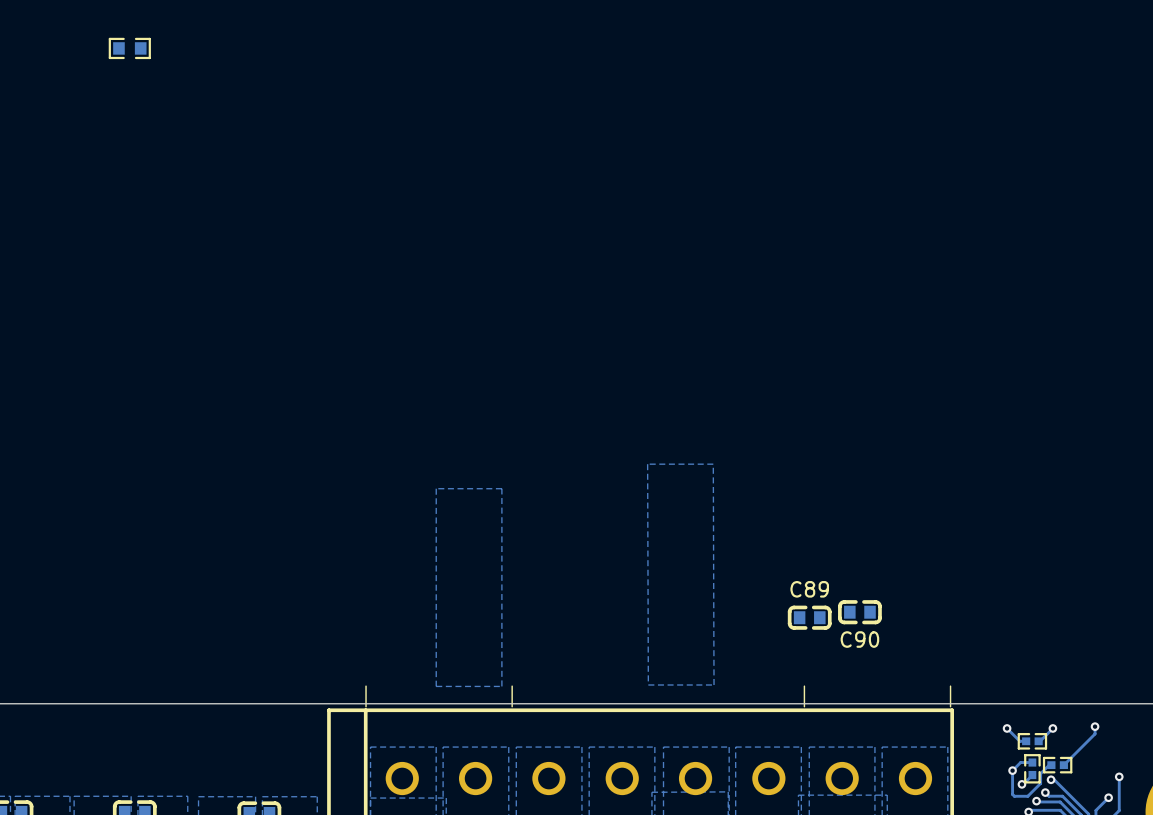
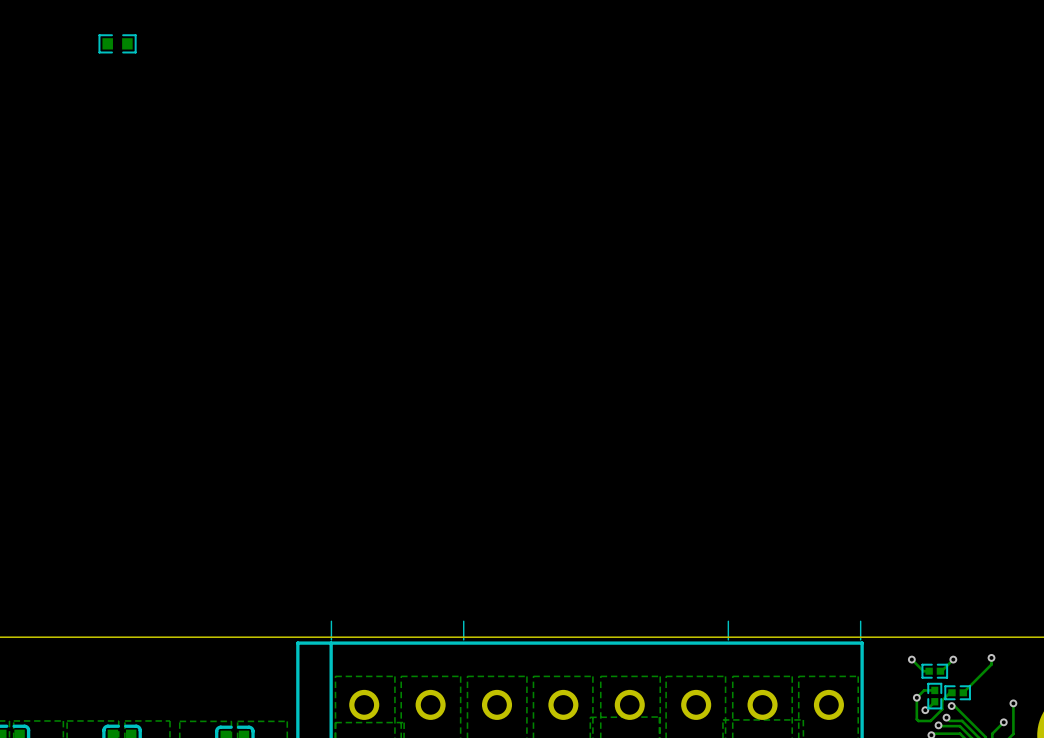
zone outline: (713, 464) (714, 684) (648, 684) (647, 464) (713, 464) -> none
zone outline: (501, 488) (501, 686) (436, 686) (436, 488) (501, 488) -> none
C90: (859, 612) -> none
C89: (809, 617) -> none

